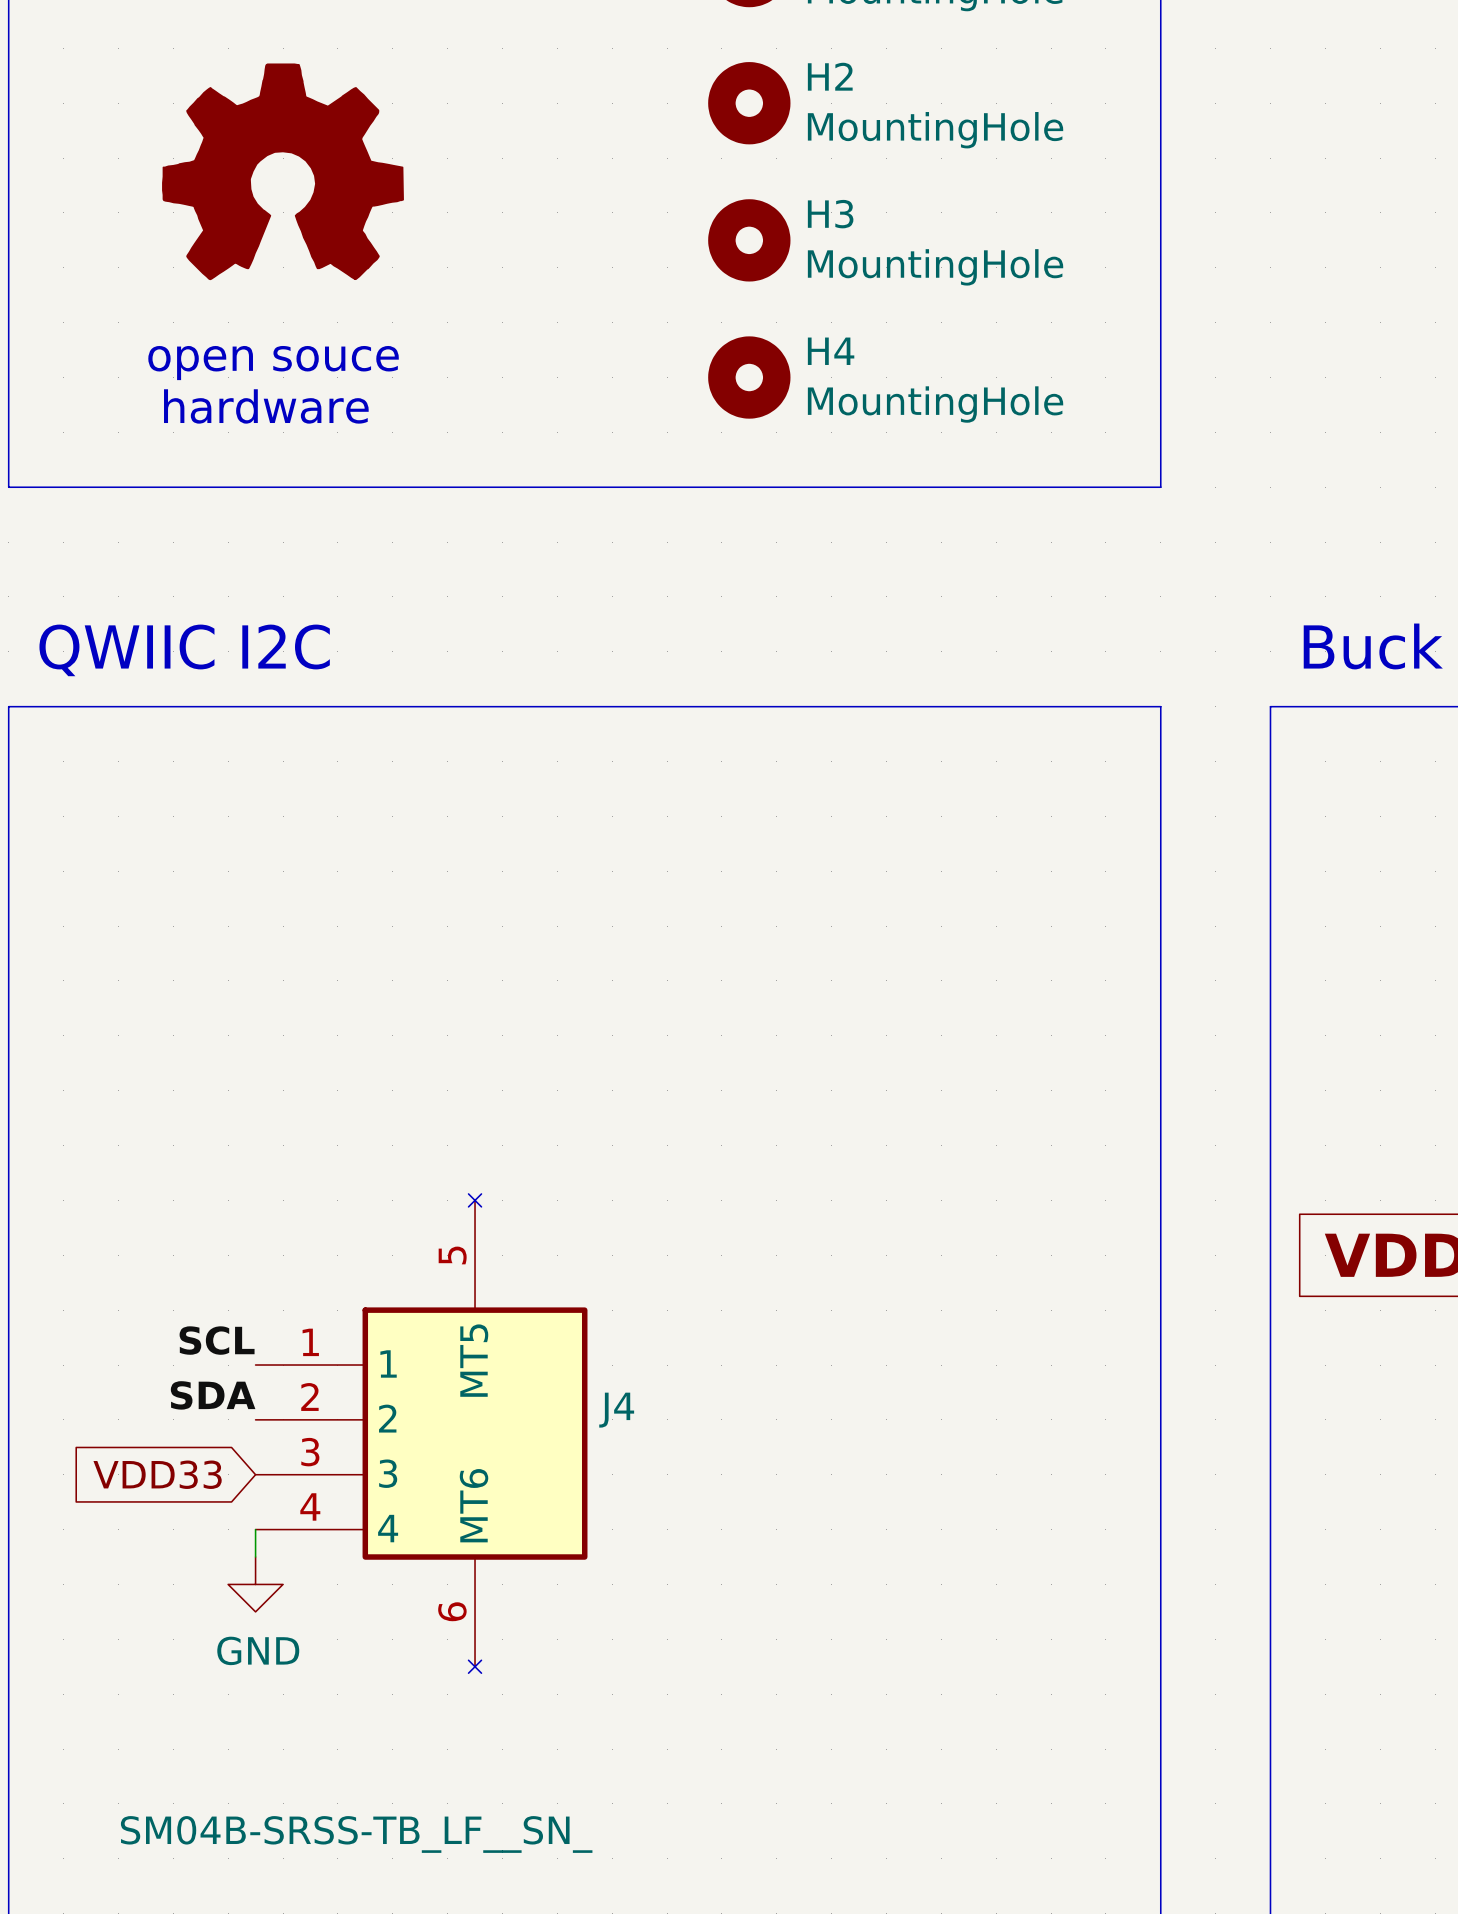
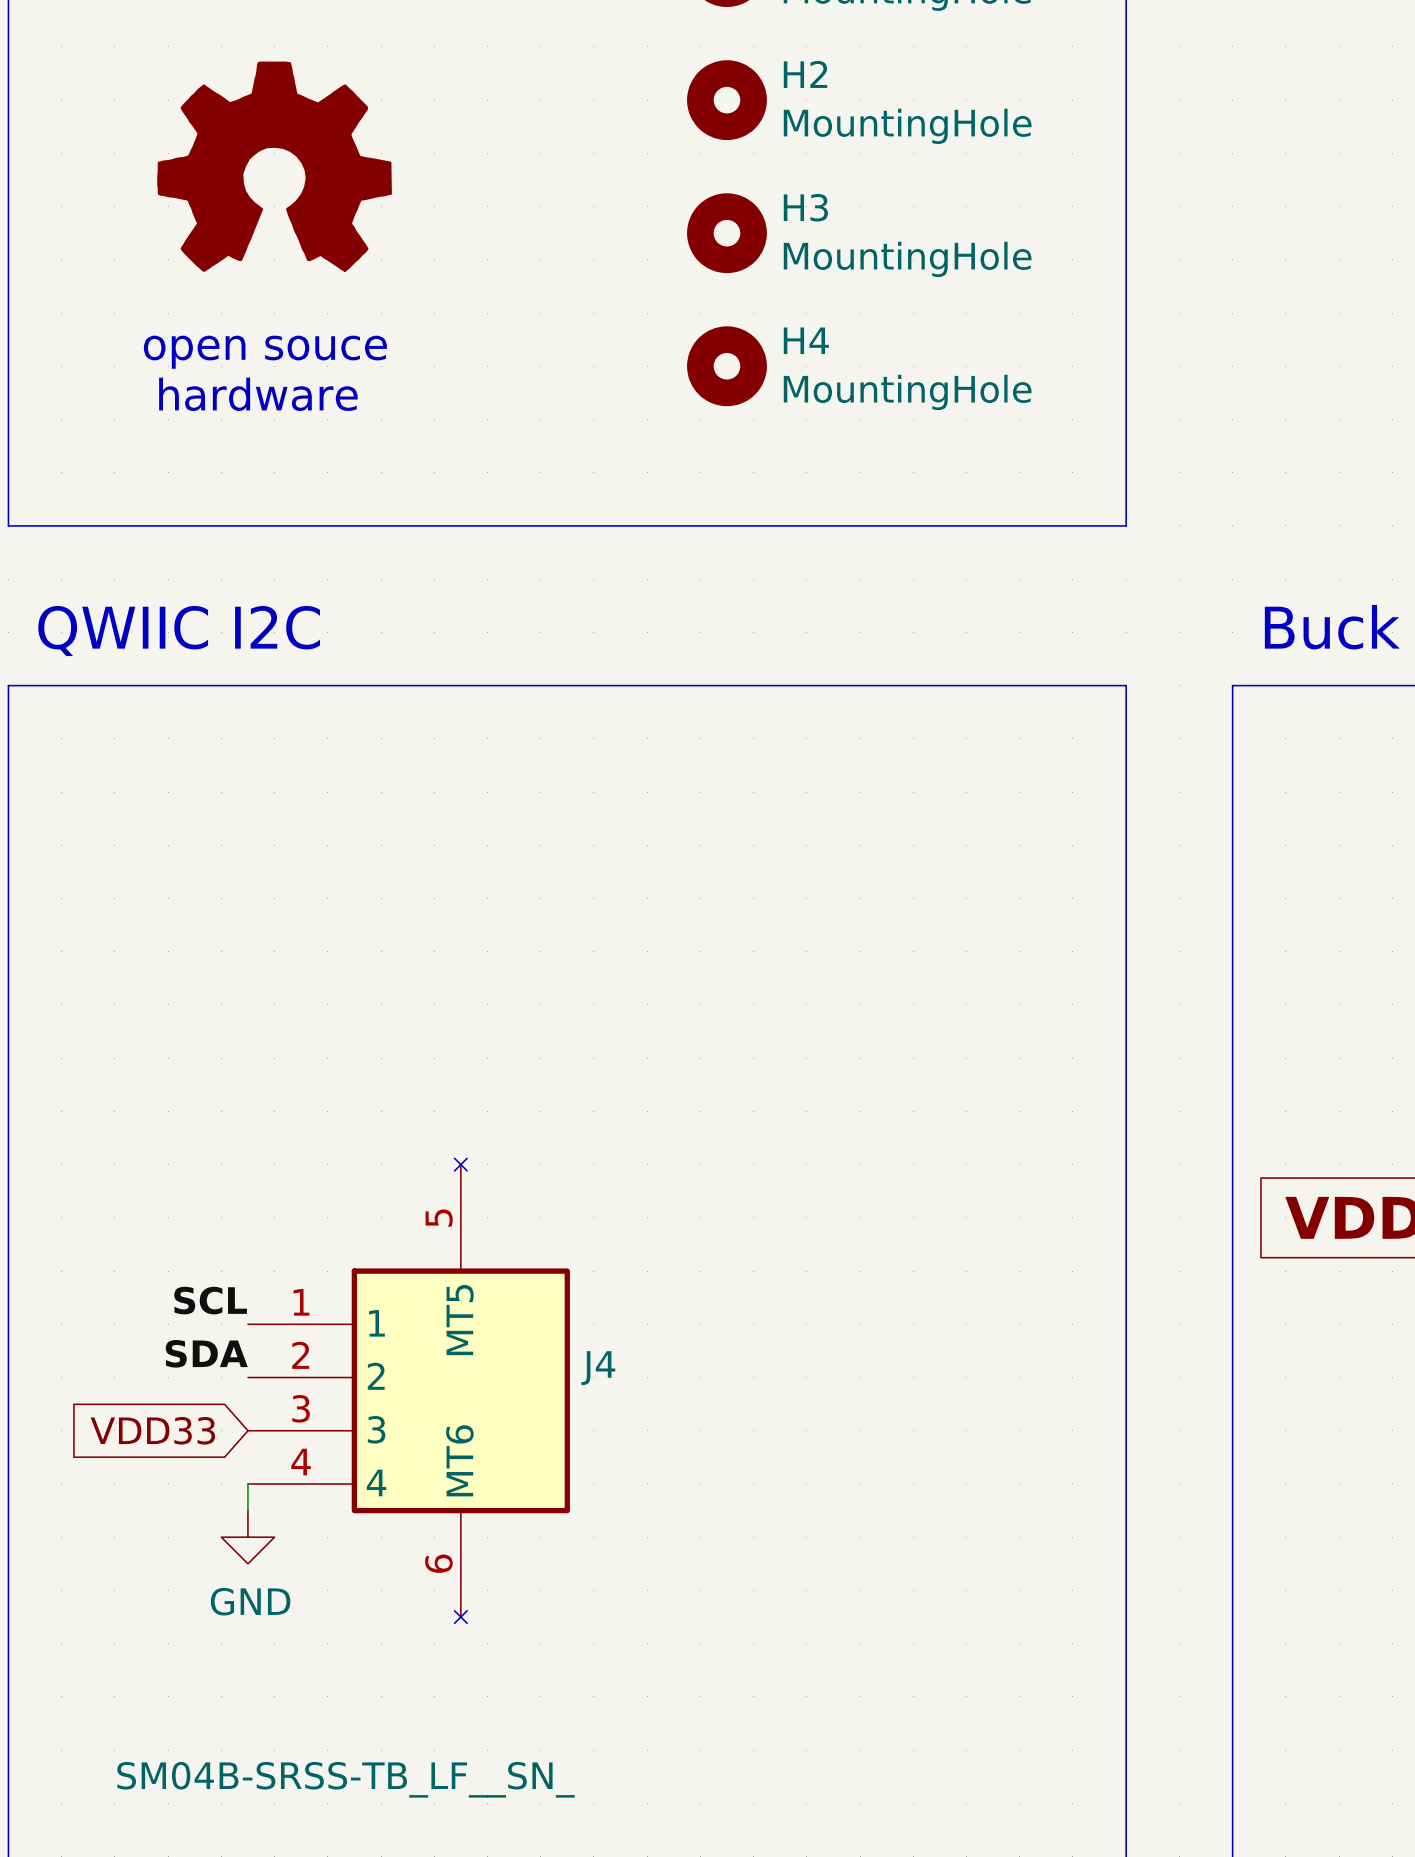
line: (8, 487) (1160, 487) -> (8, 472) (8, 525) (1126, 525) (1126, 472)

